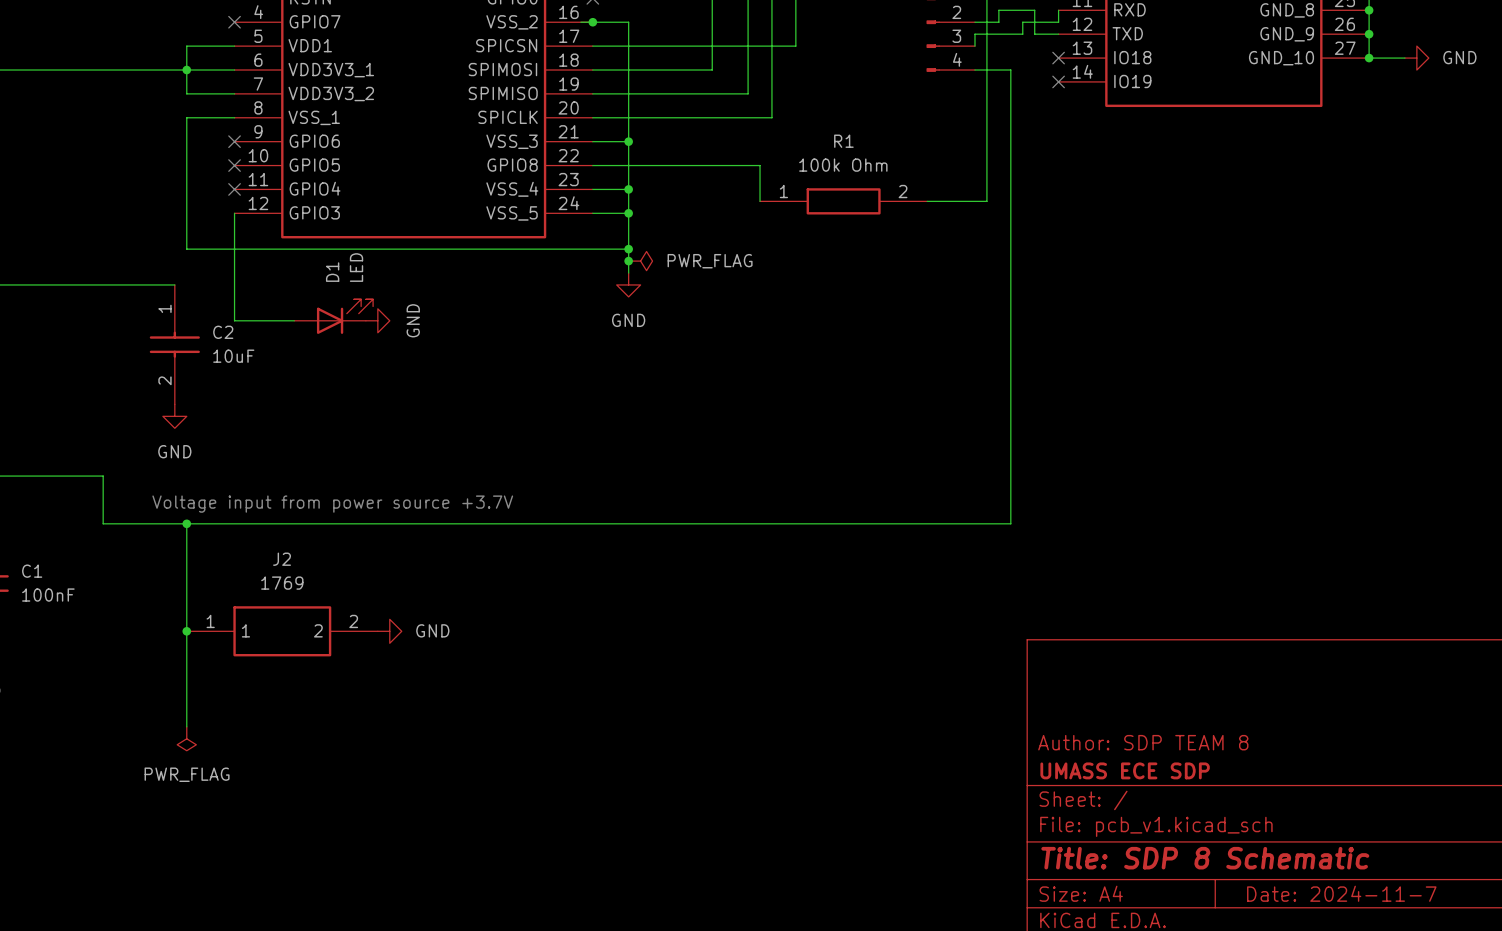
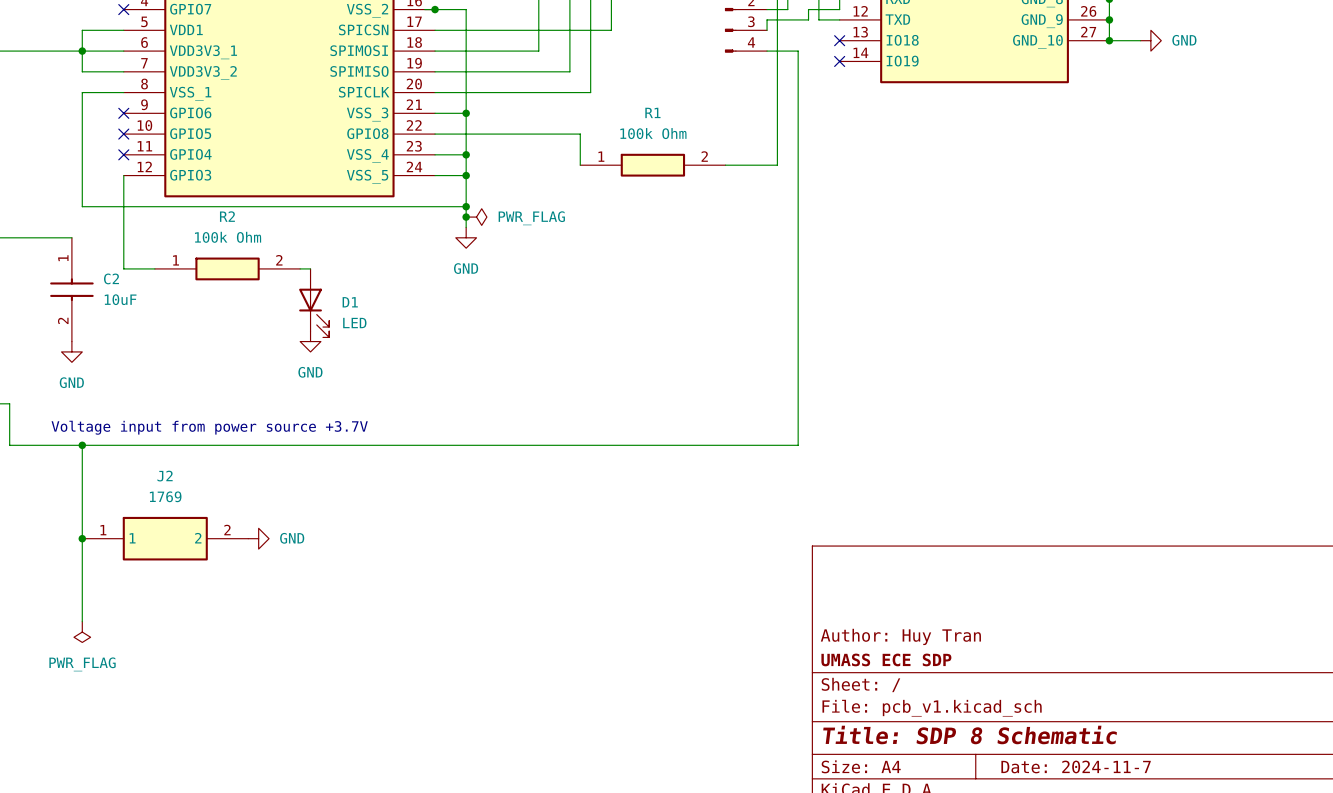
D1 position: (333, 316) -> (314, 303)
D1 rotation: 0° (345, 316) -> 90° clockwise (314, 313)
R2: none -> 100k Ohm (227, 268)
power symbol rotation: 0° (377, 320) -> 90° clockwise (310, 341)
power symbol position: GND (377, 320) -> GND (310, 341)
wire: none -> (300, 268) (310, 268)
title block: Author: SDP TEAM 8 (1143, 742) -> Author: Huy Tran (900, 636)

